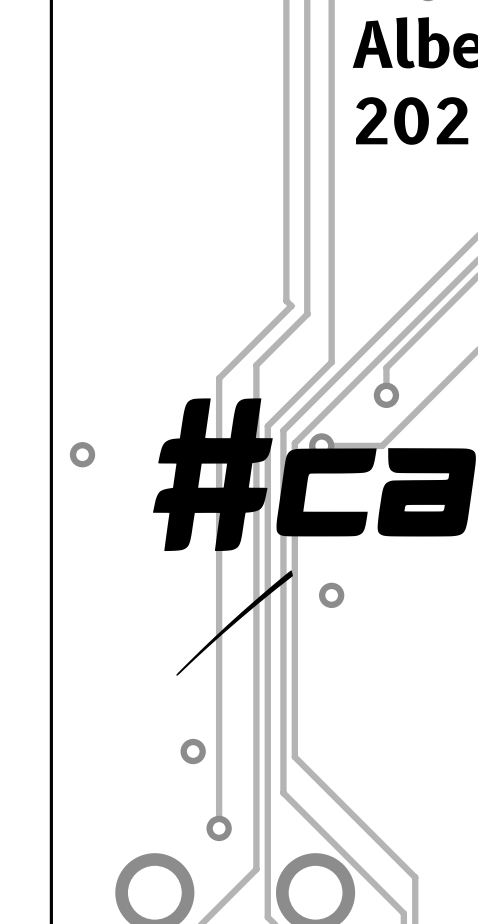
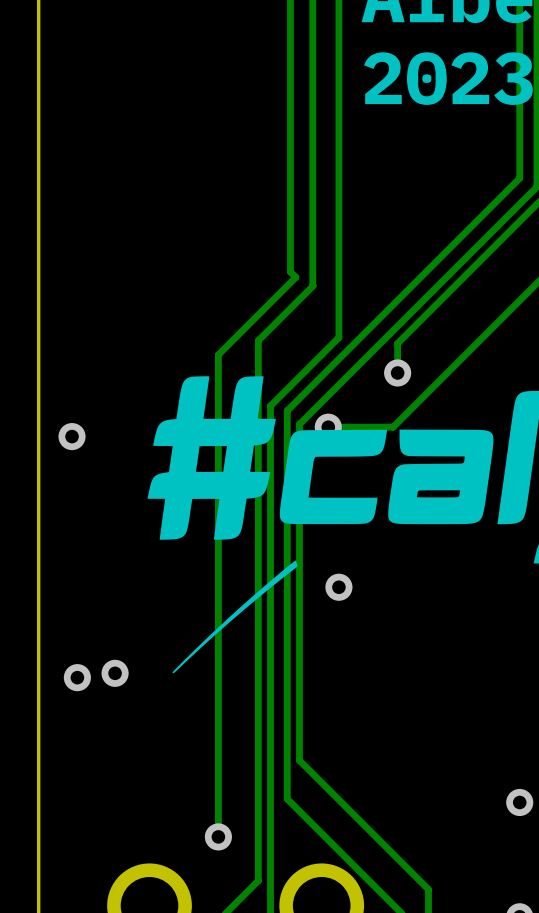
via: none -> (115, 673)
via: none -> (77, 677)
via: (193, 751) -> none

